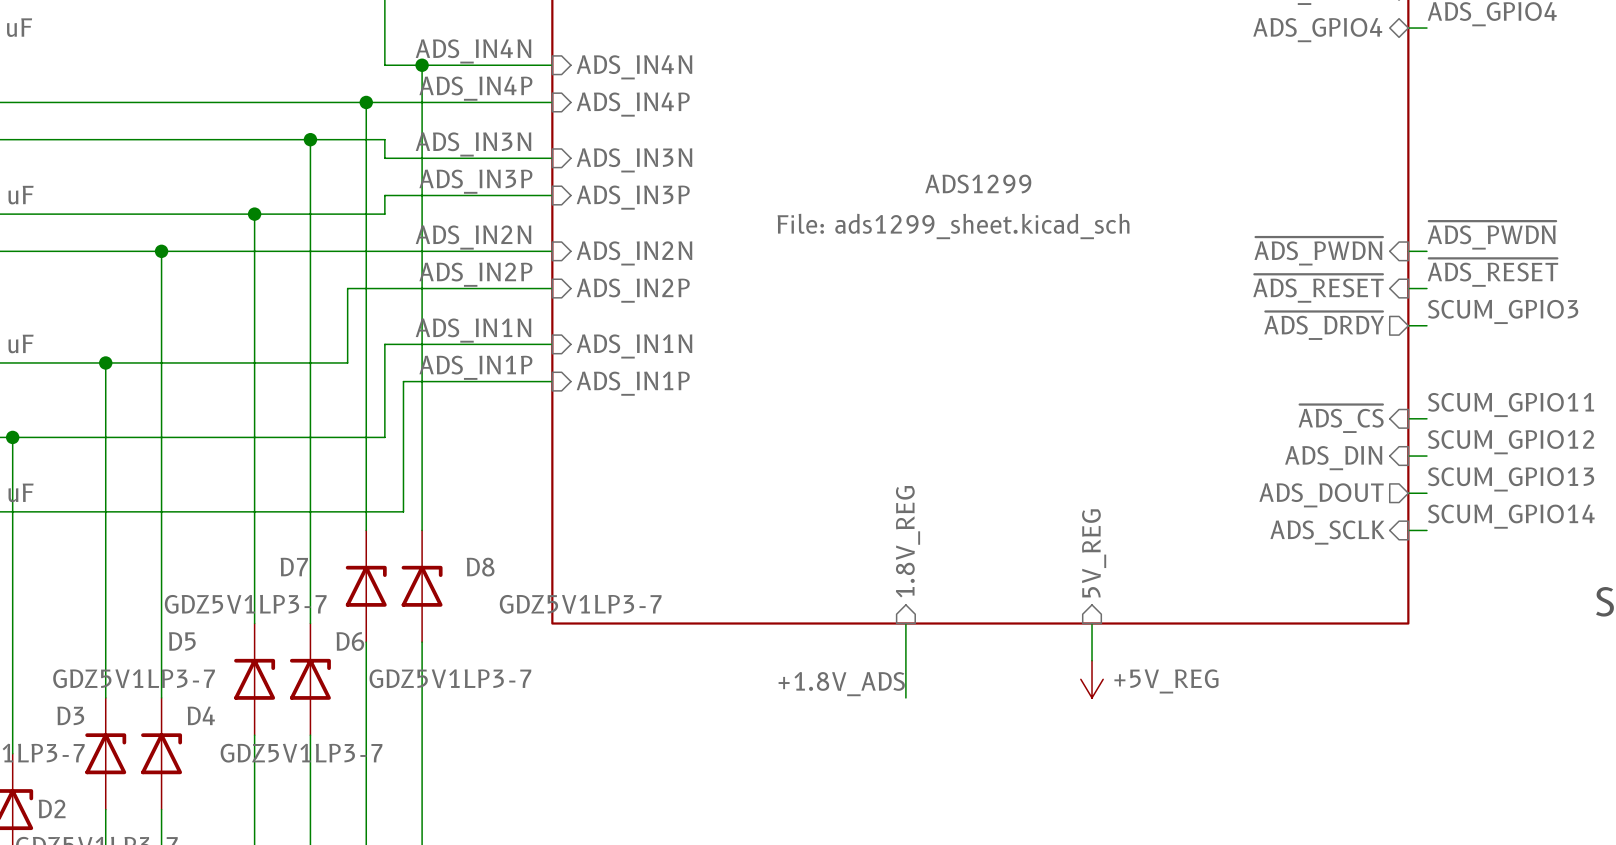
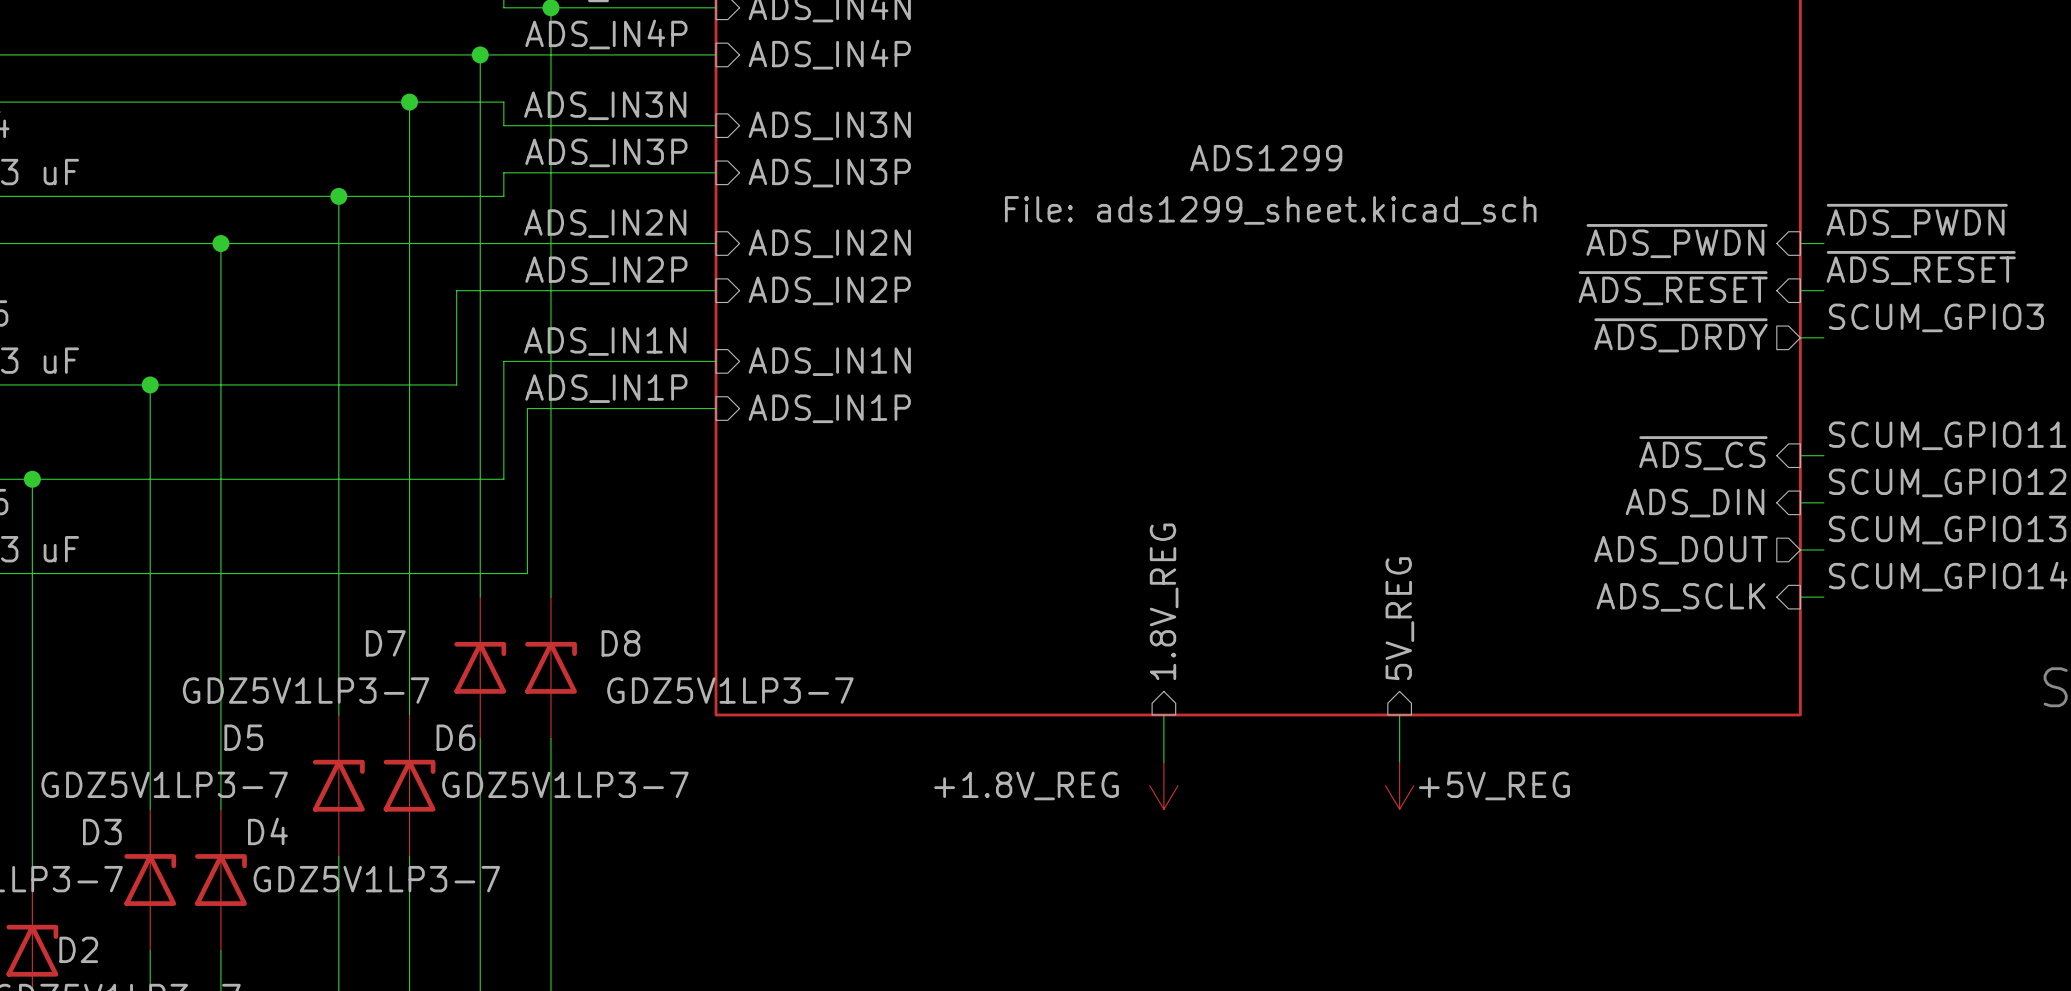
power symbol: none -> +1.8V_REG (1163, 785)
label: +1.8V_ADS (841, 684) -> none

